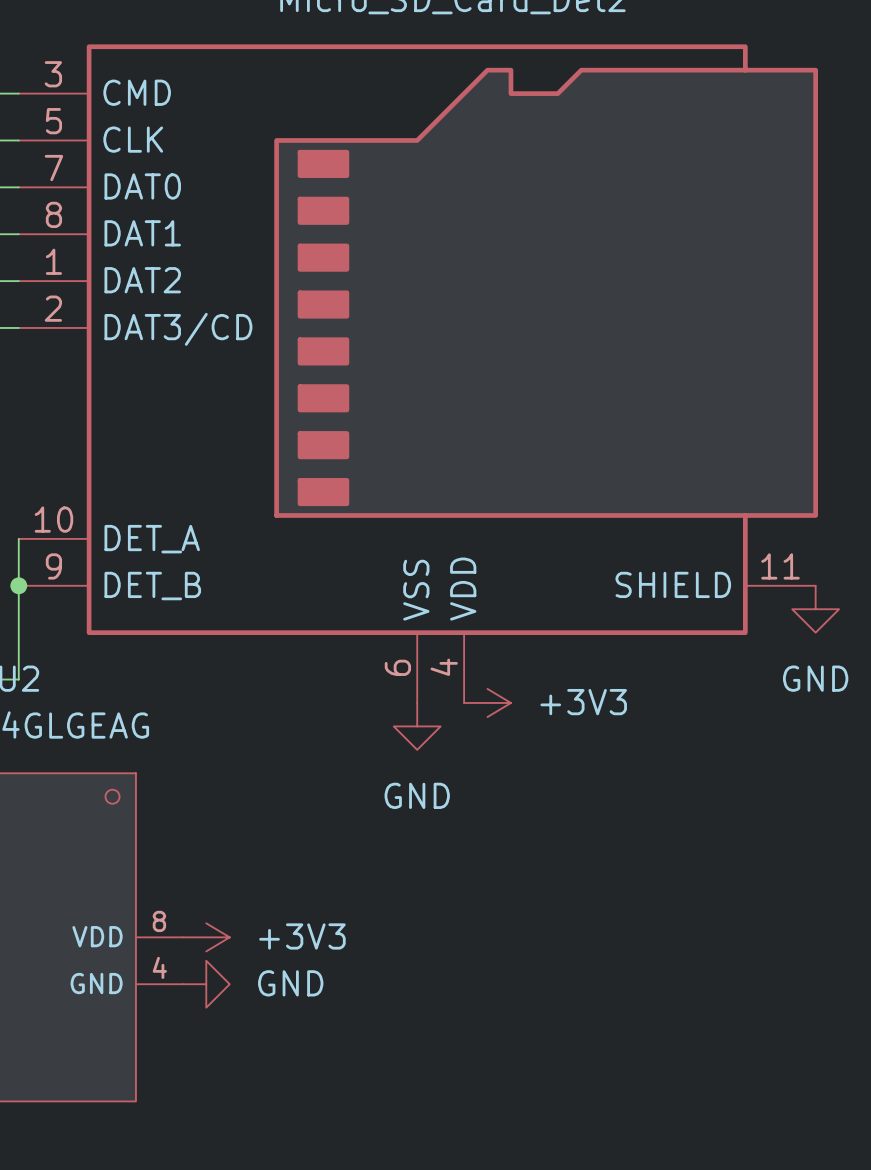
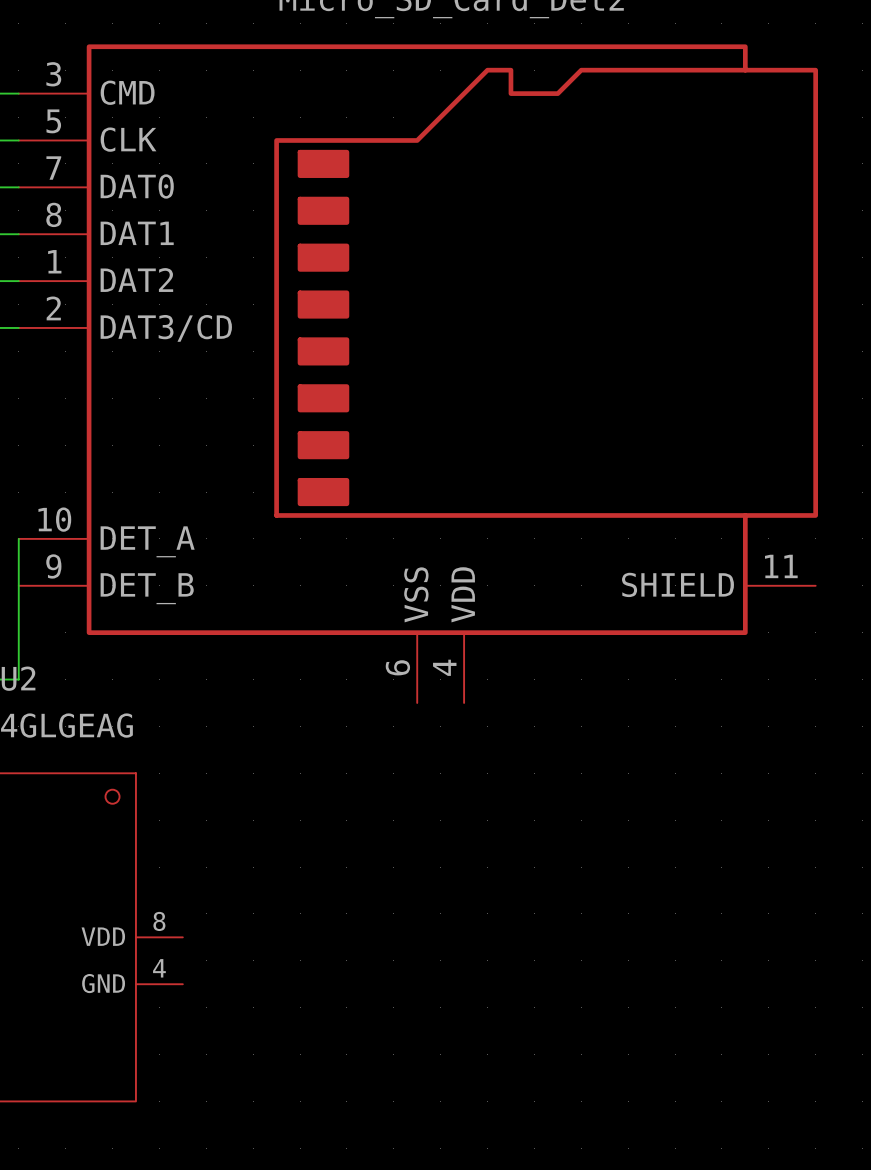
junction: (18, 585) -> none
power symbol: GND (815, 609) -> none
power symbol: +3V3 (487, 702) -> none
power symbol: GND (417, 726) -> none
power symbol: +3V3 (206, 937) -> none
power symbol: GND (206, 984) -> none

